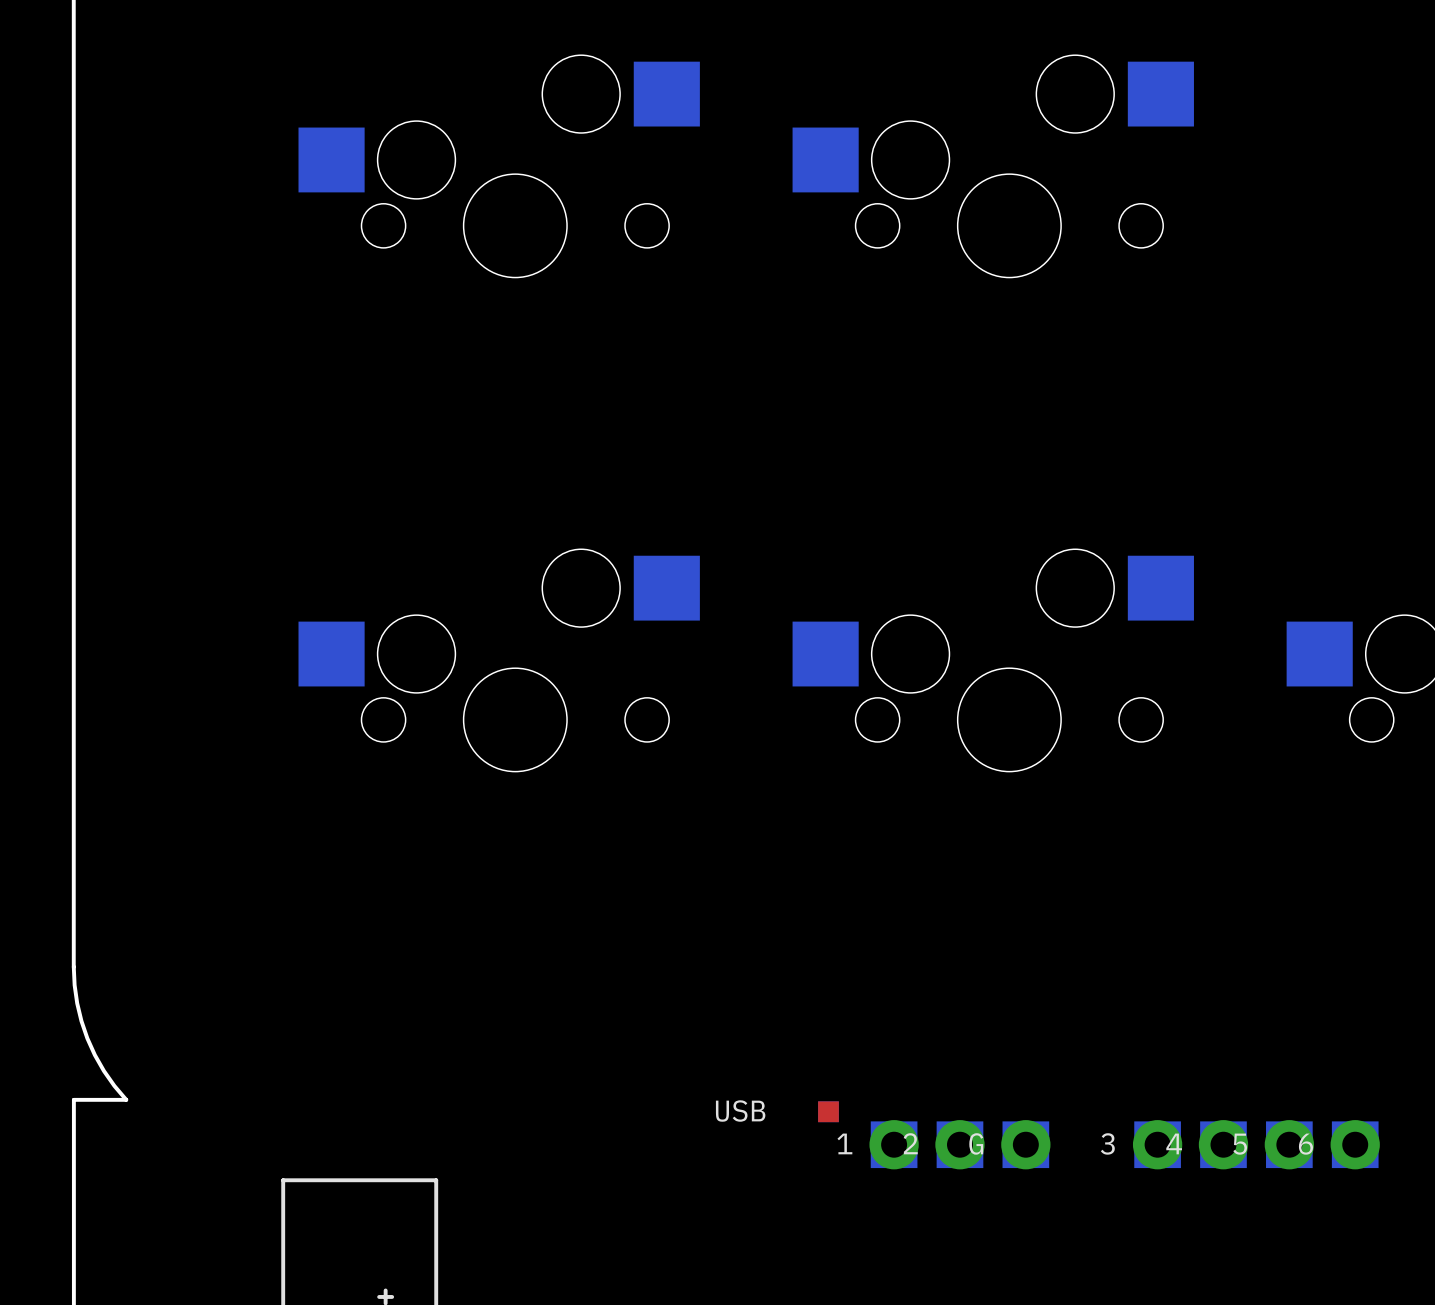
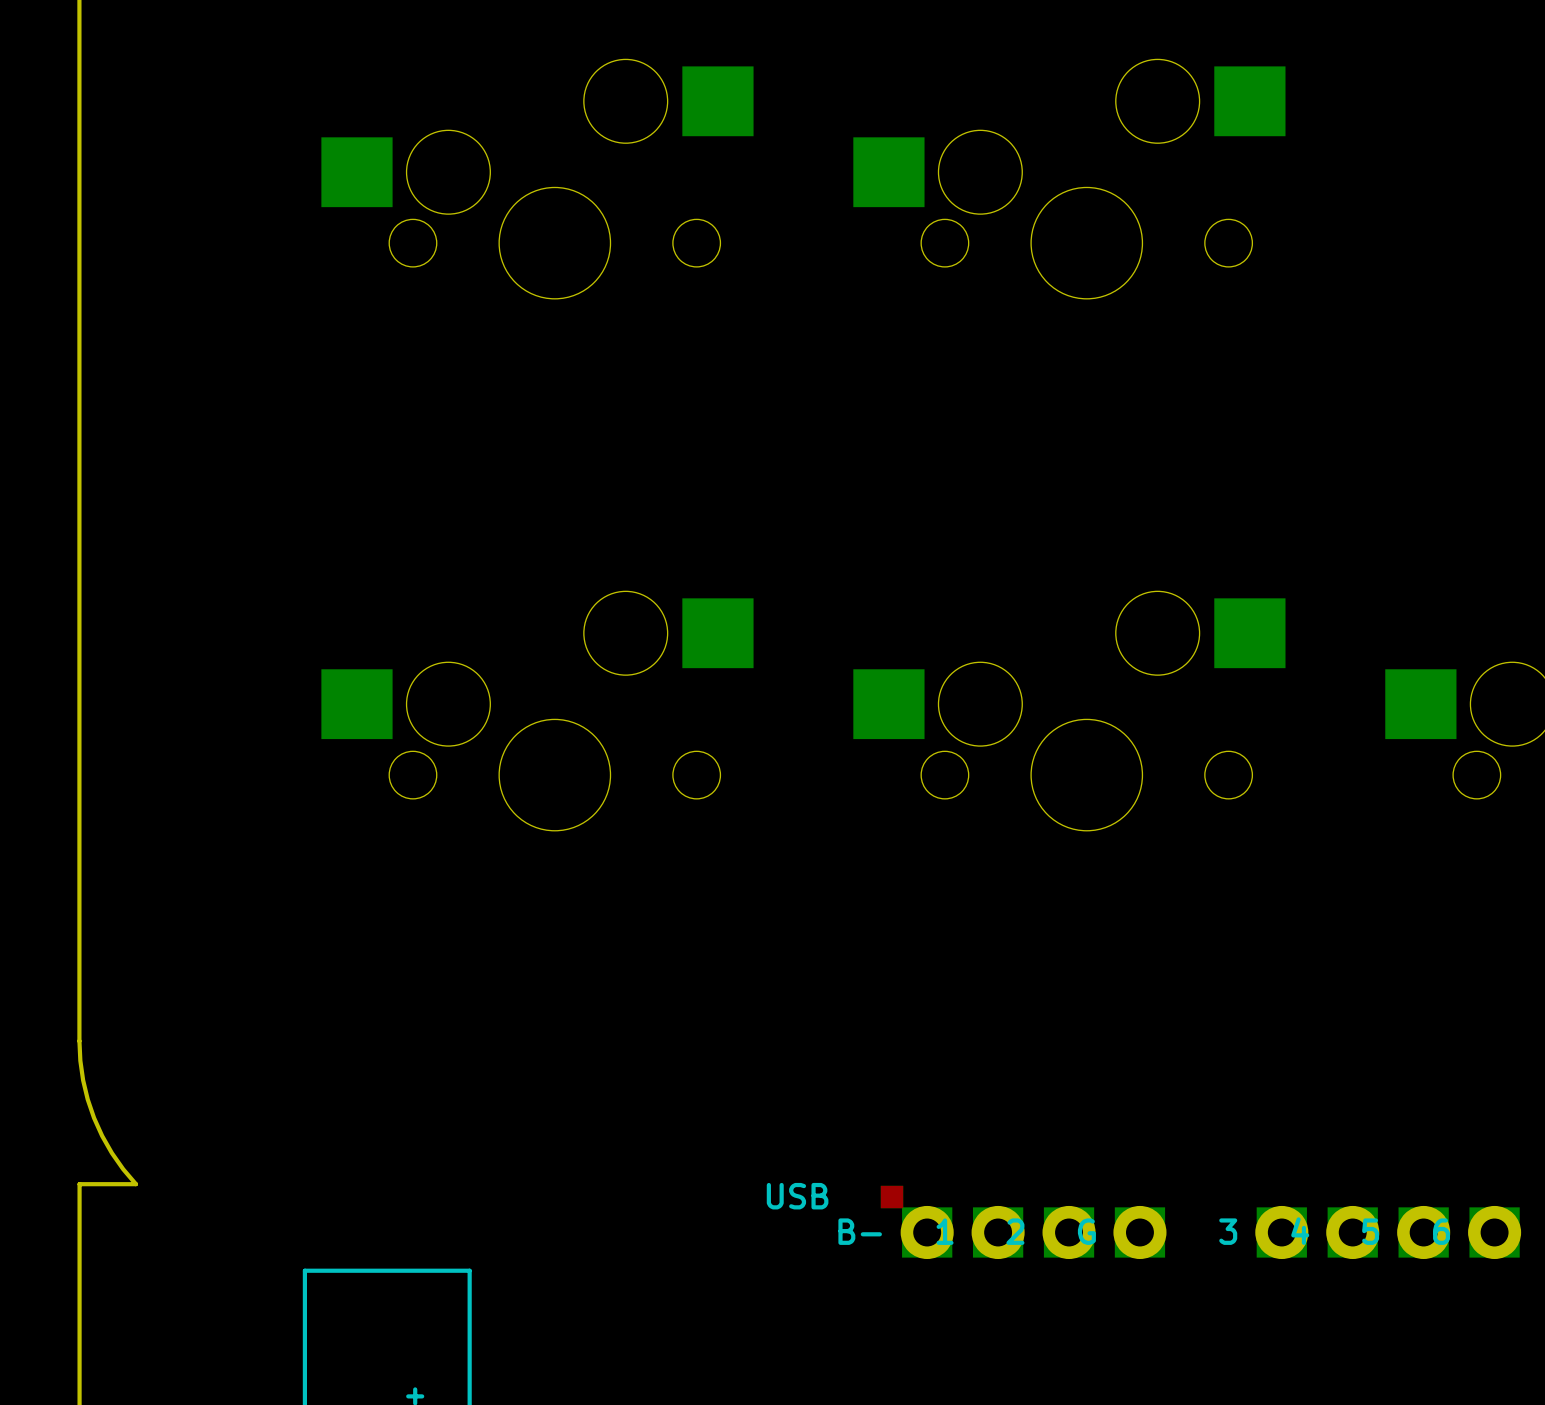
part: none -> (927, 1232)
part position: (894, 1144) -> (998, 1232)
part position: (959, 1144) -> (1069, 1232)
part position: (1025, 1144) -> (1139, 1232)
part position: (1157, 1144) -> (1281, 1232)
part position: (1223, 1144) -> (1352, 1232)
part position: (1289, 1144) -> (1423, 1232)
part position: (1355, 1144) -> (1494, 1232)

